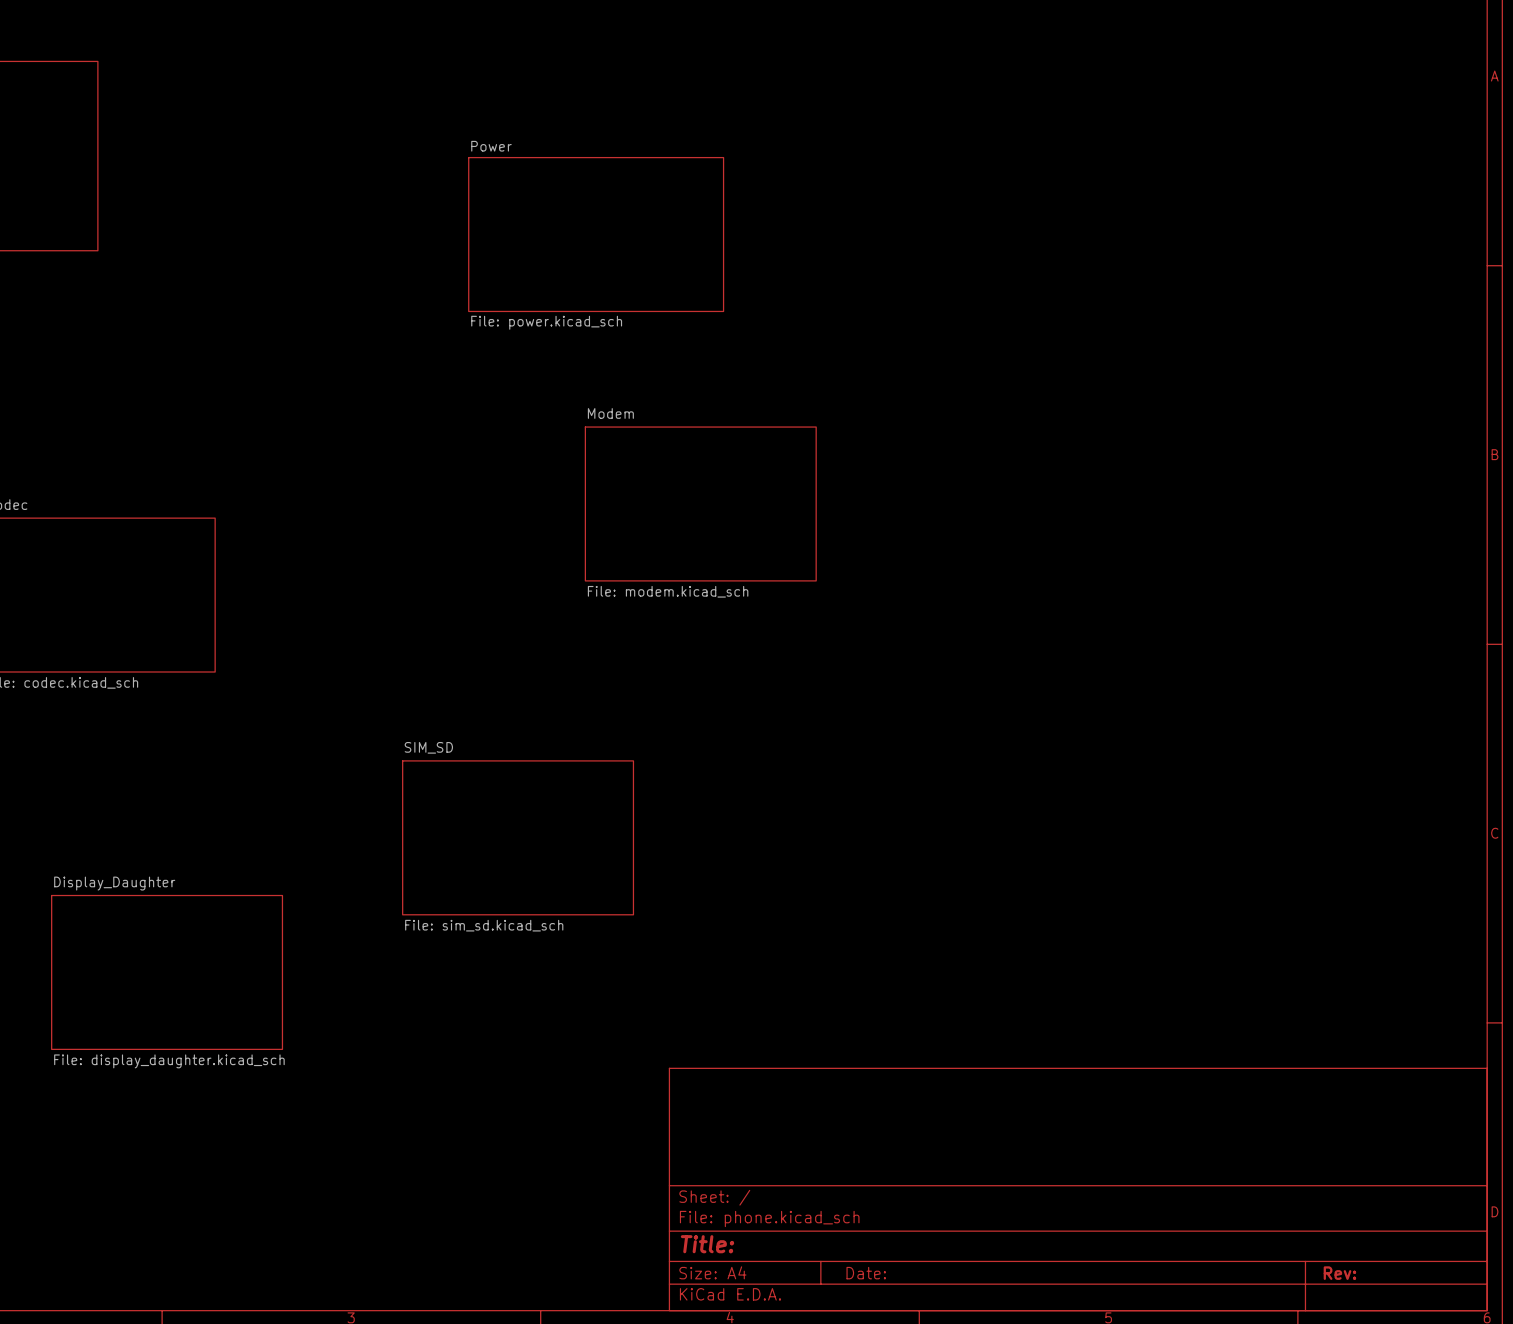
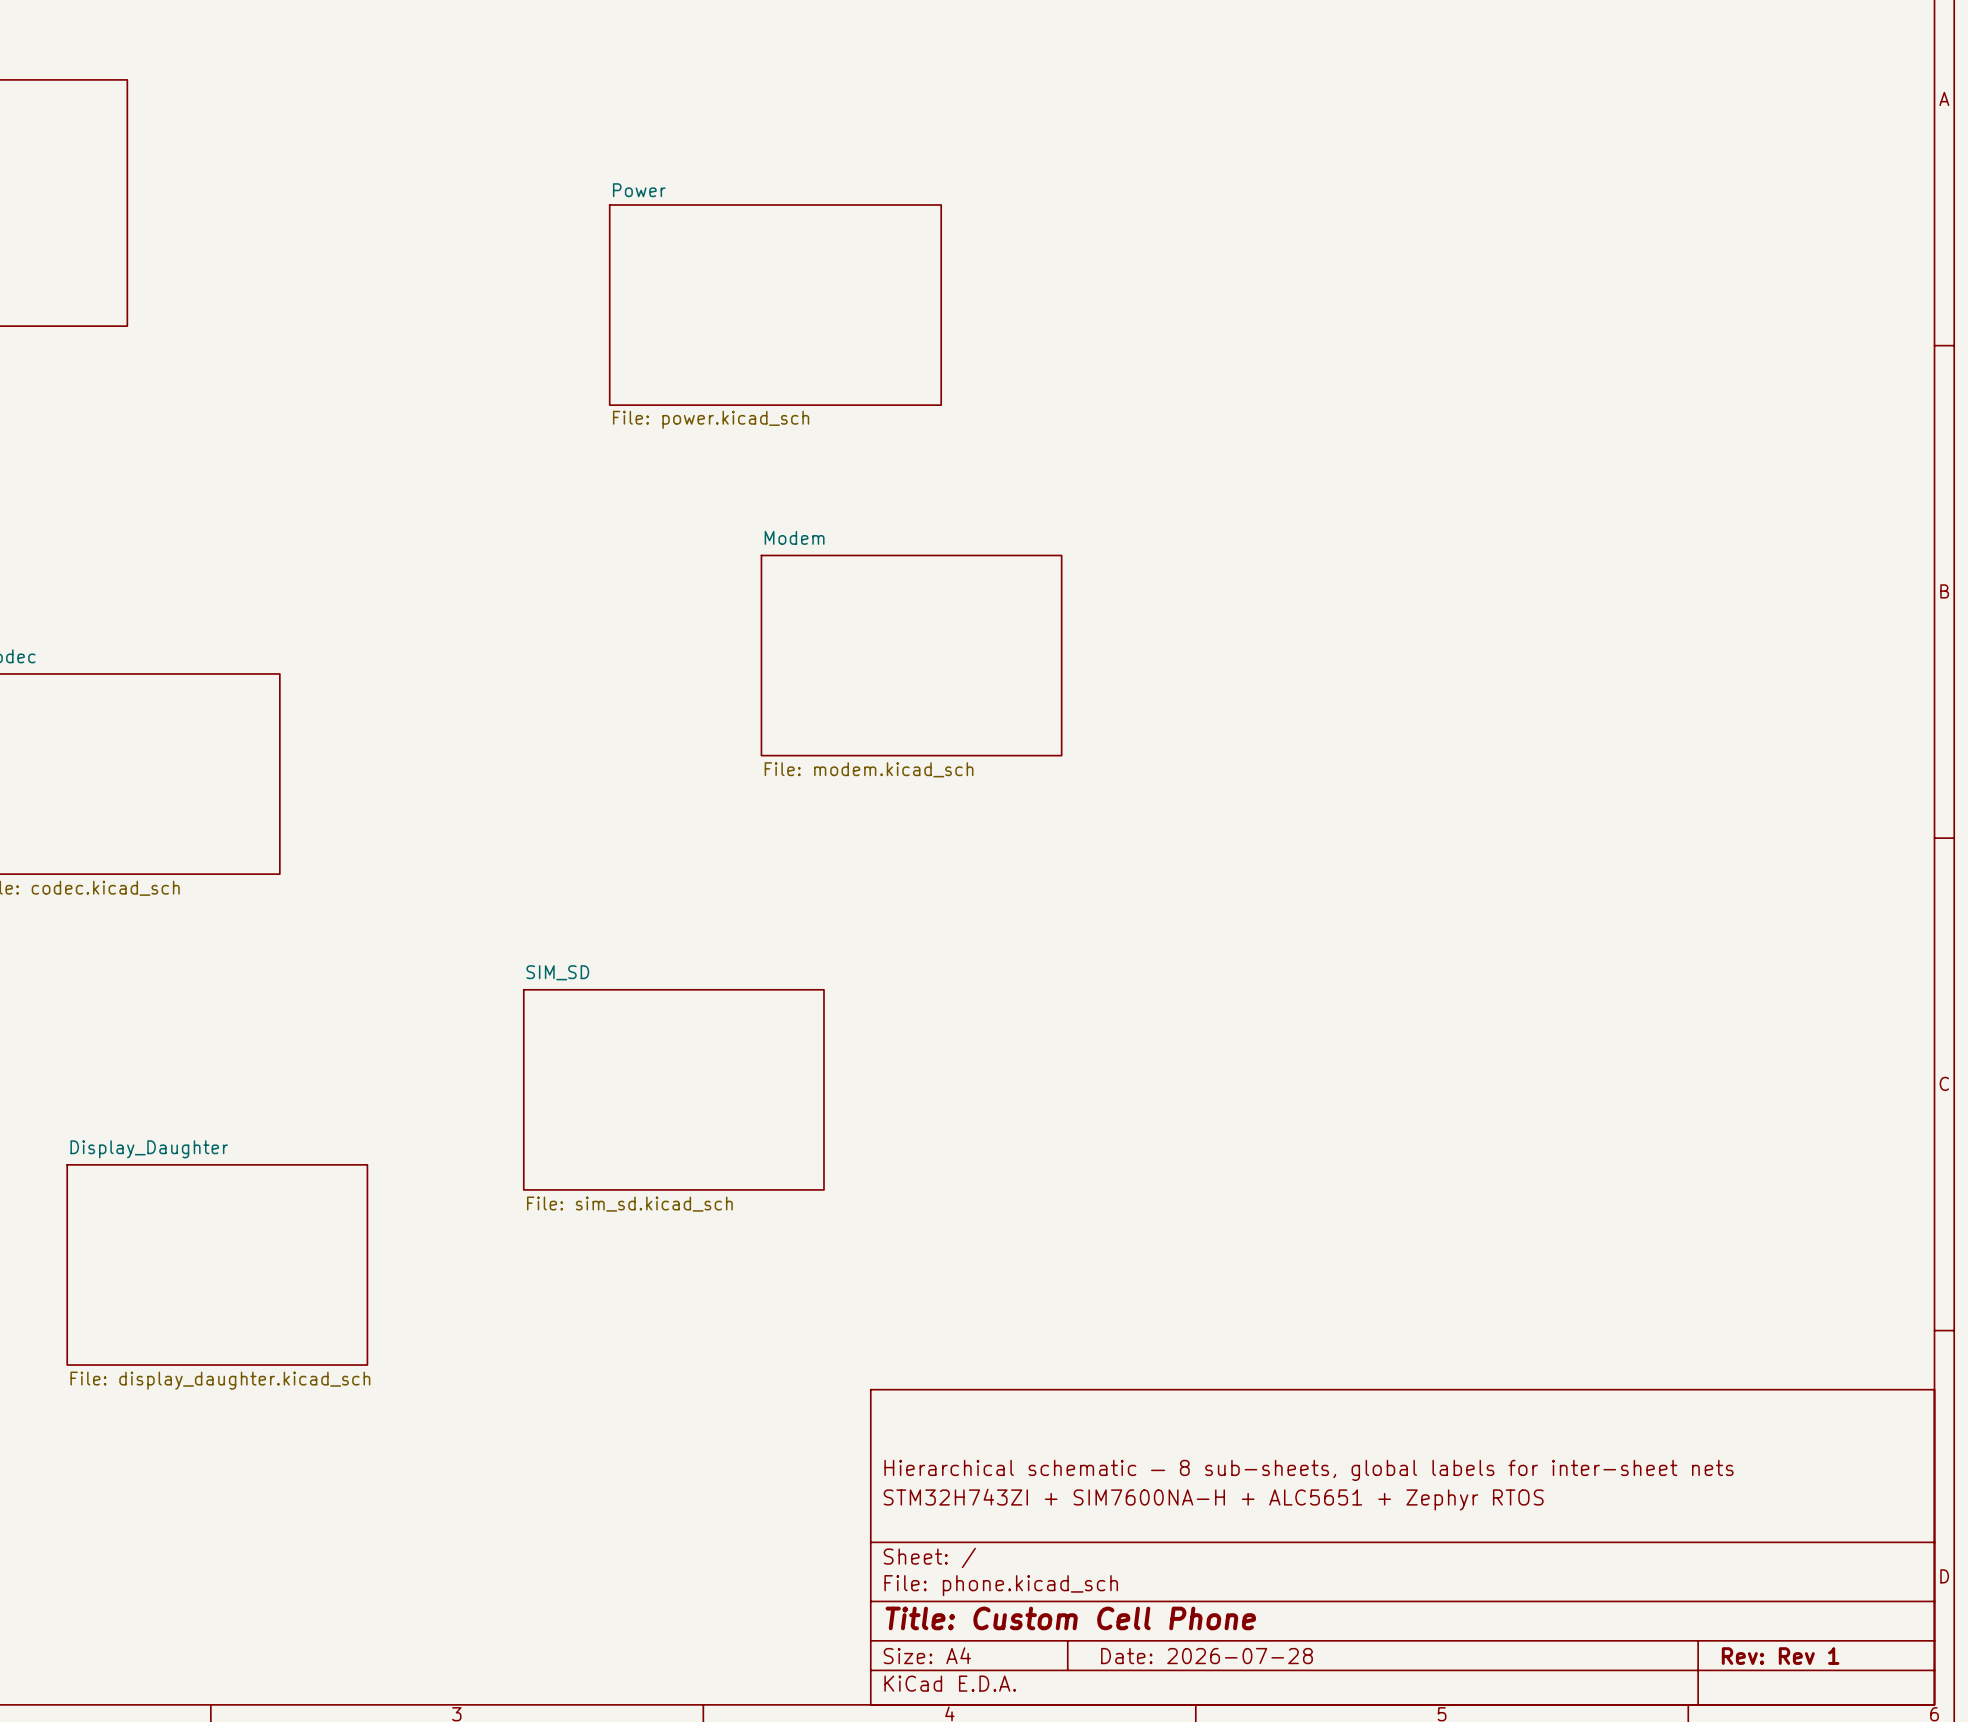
title block: none -> Hierarchical schematic — 8 sub-sheets, global labels for inter-sheet nets (1309, 1470)
title block: none -> STM32H743ZI + SIM7600NA-H + ALC5651 + Zephyr RTOS (1213, 1499)
title block: Title: (707, 1244) -> Title: Custom Cell Phone (1070, 1618)
title block: Date: (866, 1273) -> Date: 2026-07-28 (1206, 1656)
title block: Rev: (1339, 1273) -> Rev: Rev 1 (1780, 1656)

